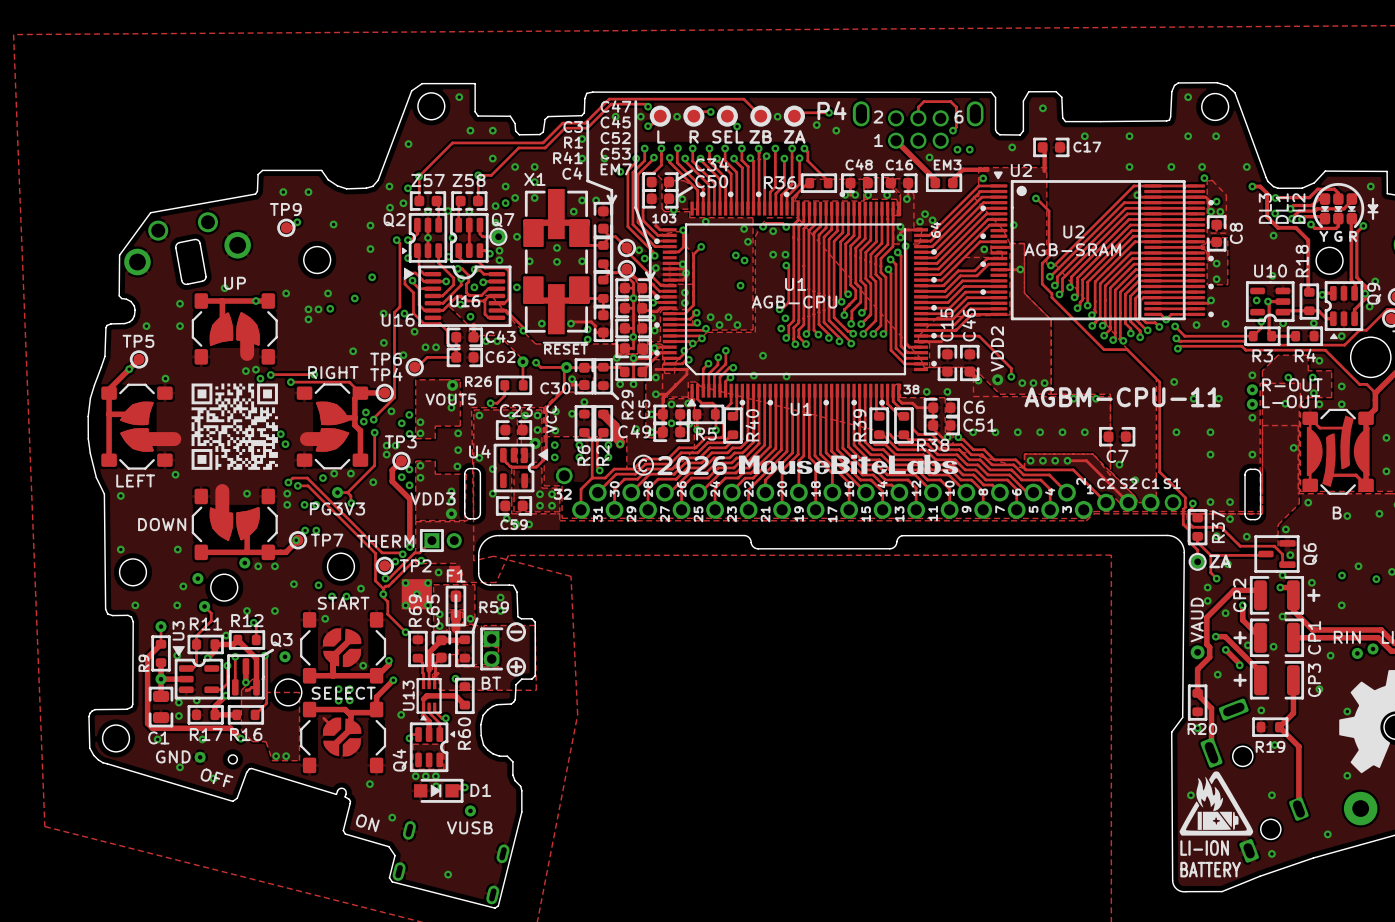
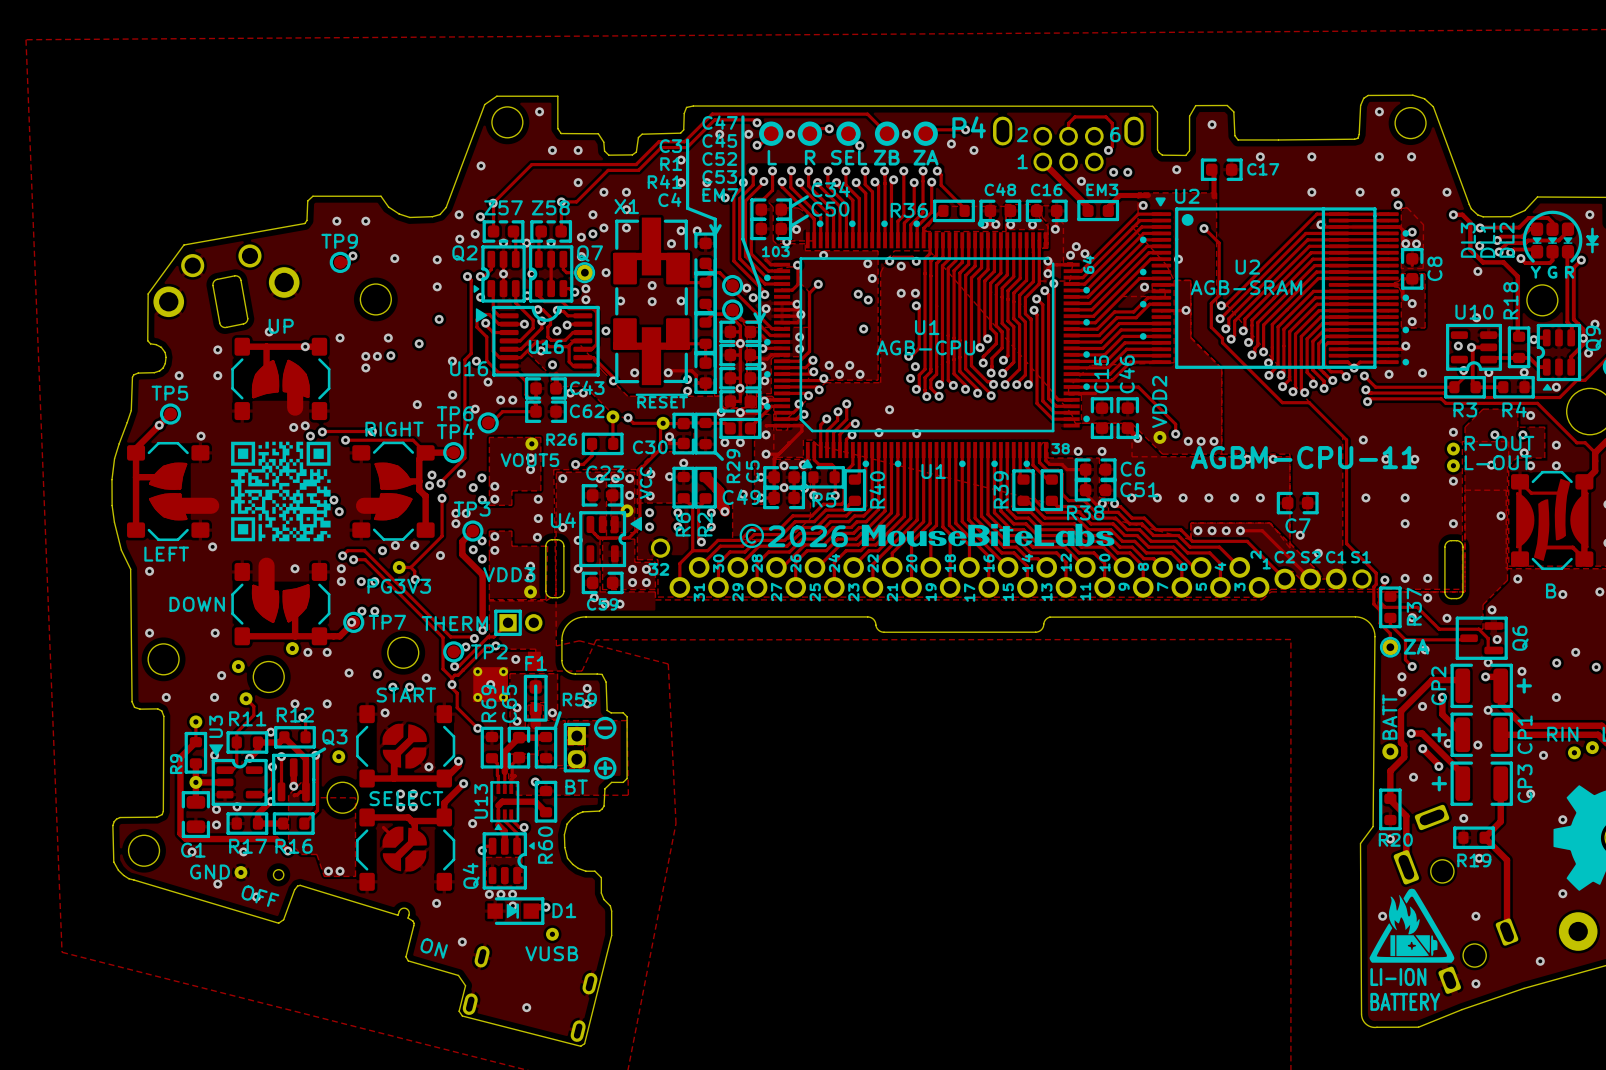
part value: VAUD (1197, 619) -> BATT (1389, 717)

